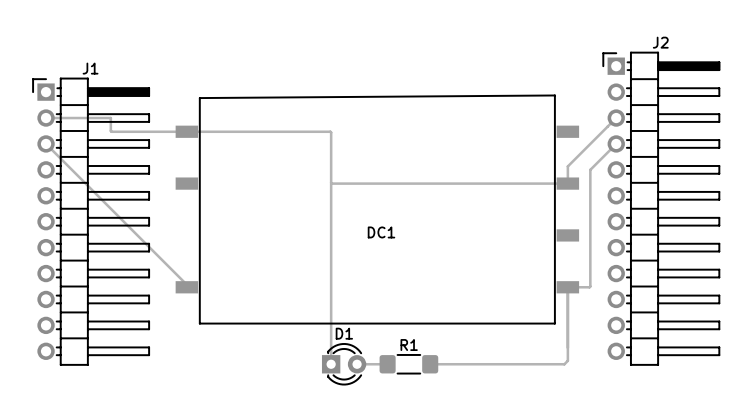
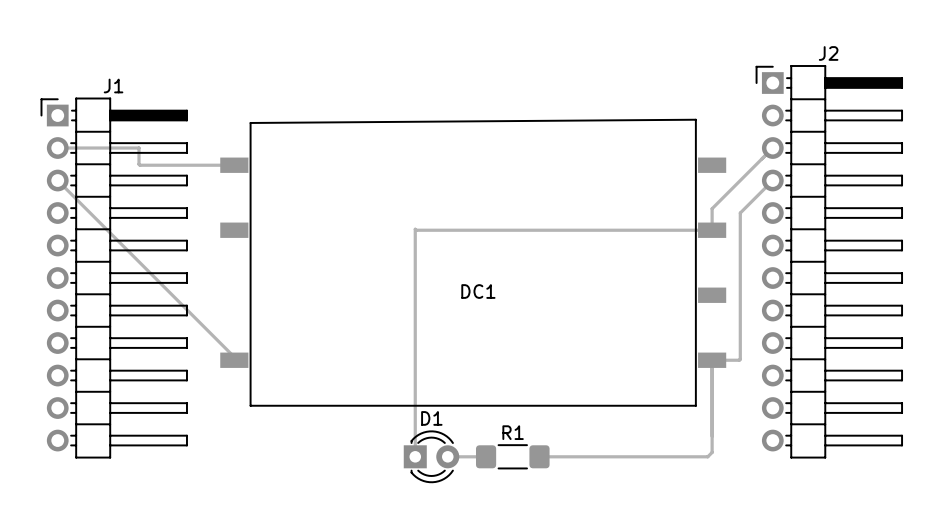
track: (186, 131) (330, 131) (331, 182) -> none

